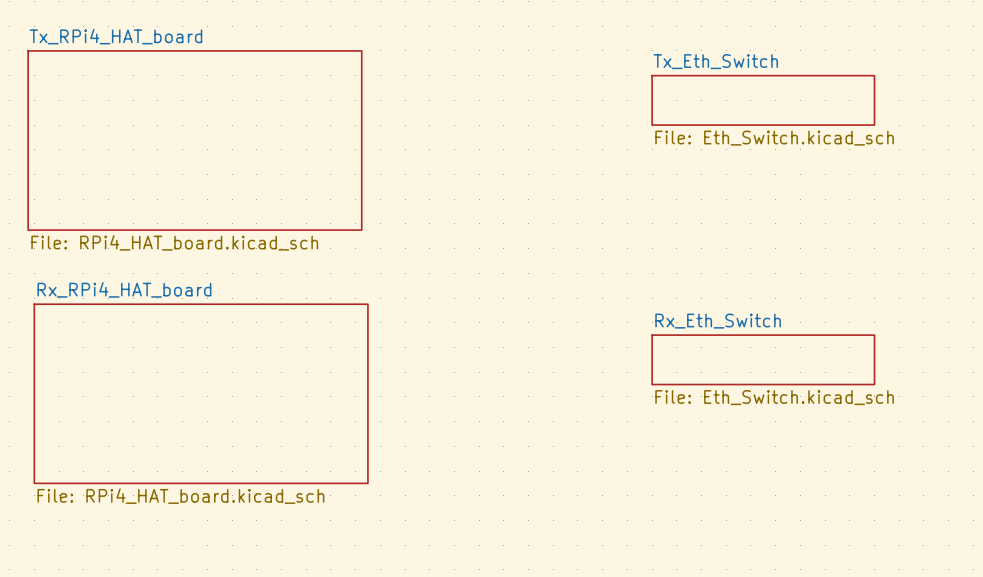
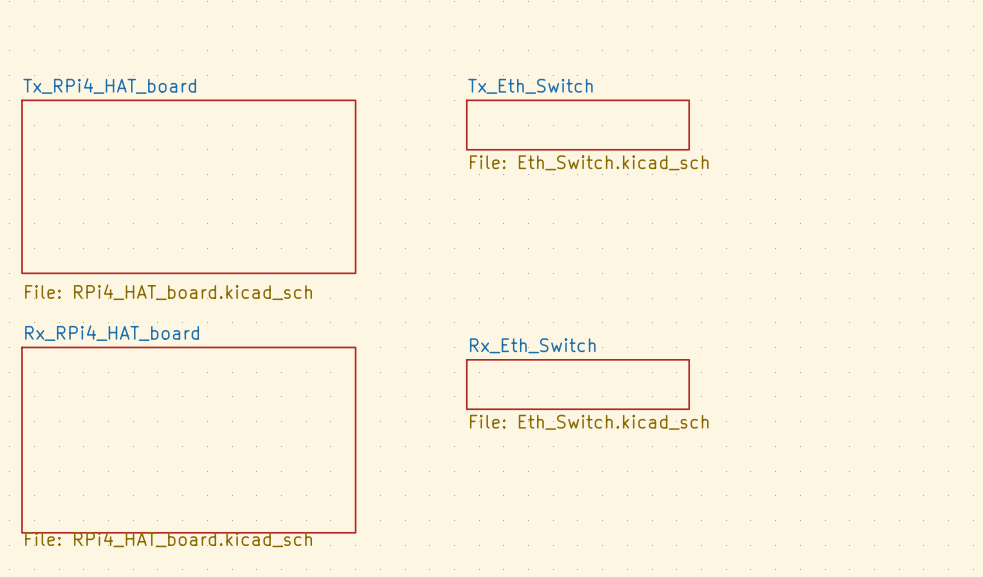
sheet Tx_RPi4_HAT_board shape: [27, 50, 363, 231] -> [21, 99, 357, 275]
sheet Tx_Eth_Switch position: (763, 100) -> (577, 125)
sheet Rx_RPi4_HAT_board shape: [33, 303, 369, 485] -> [21, 346, 357, 534]
sheet Rx_Eth_Switch position: (763, 359) -> (577, 384)

